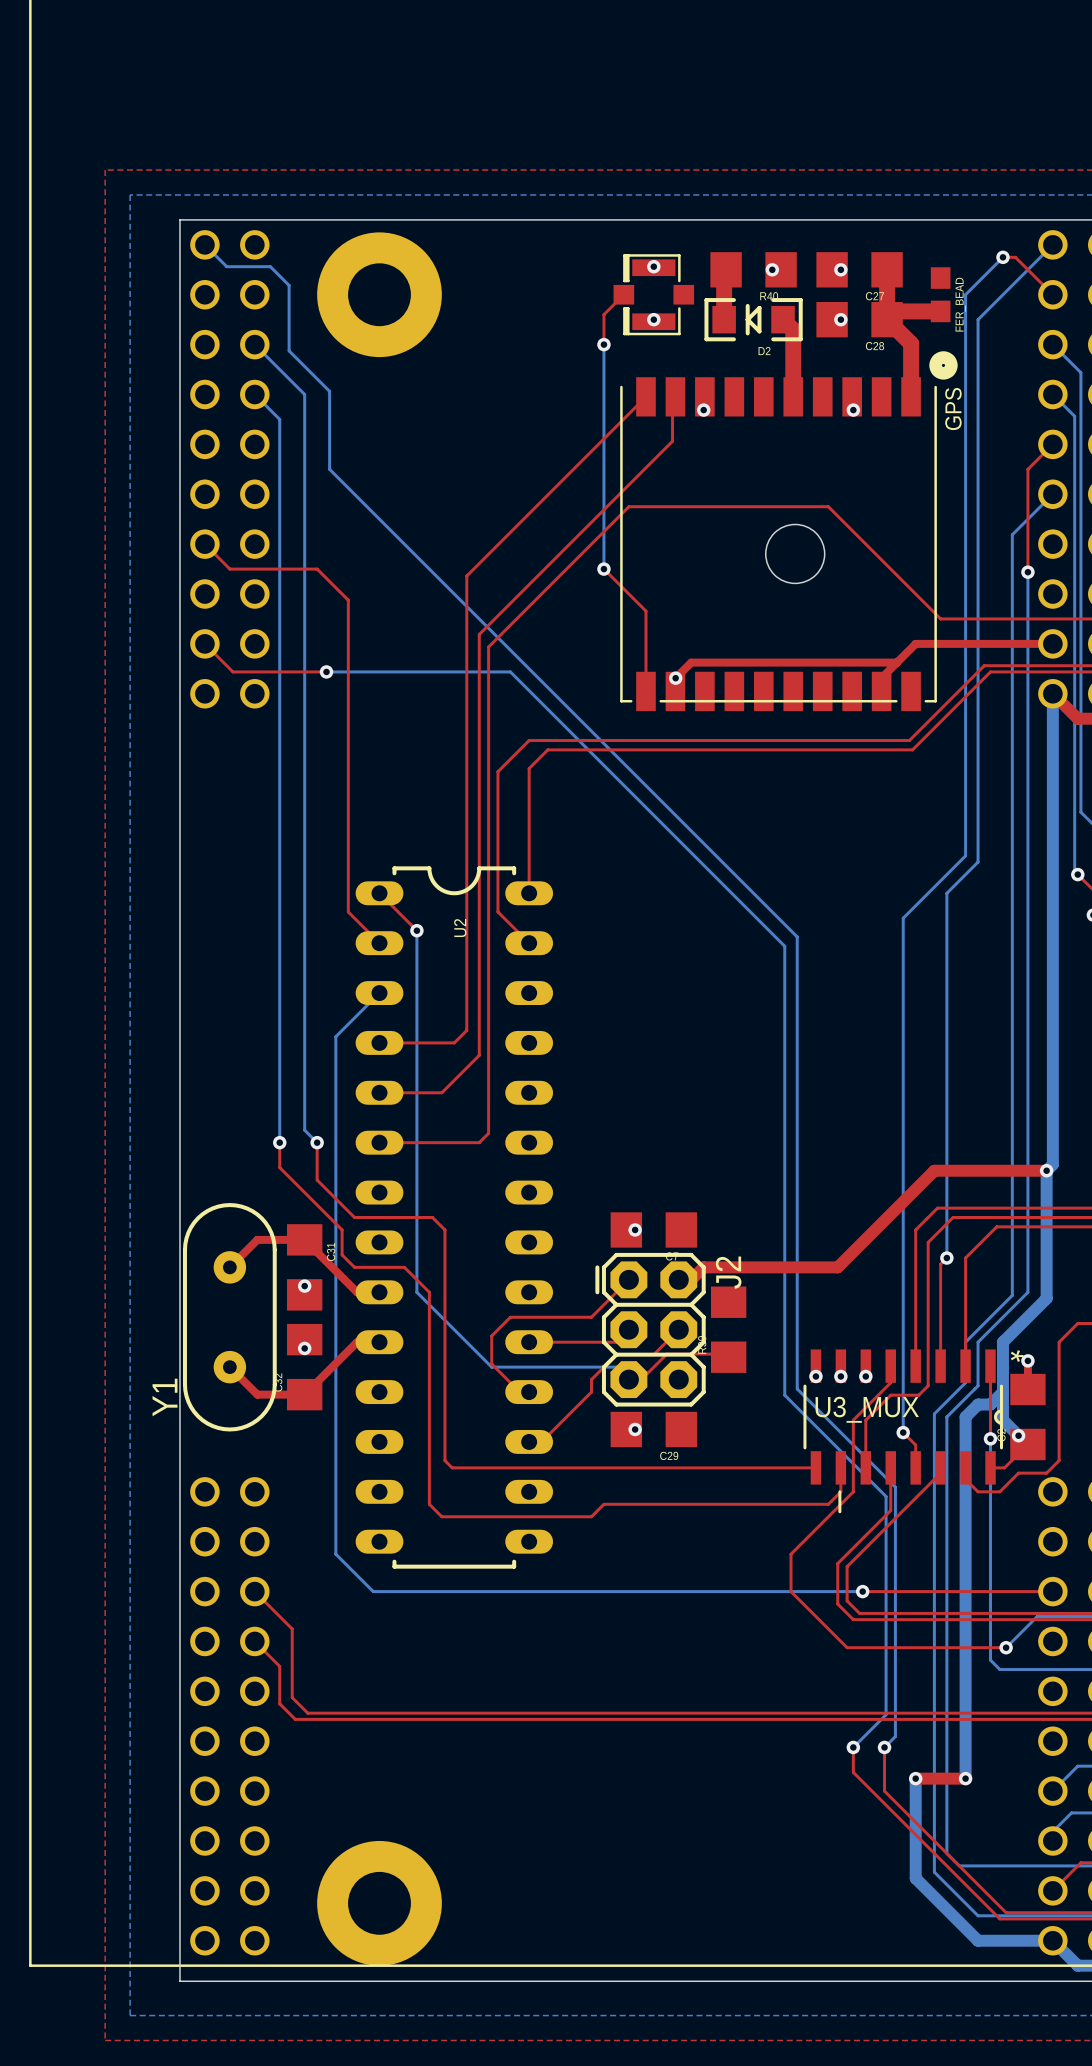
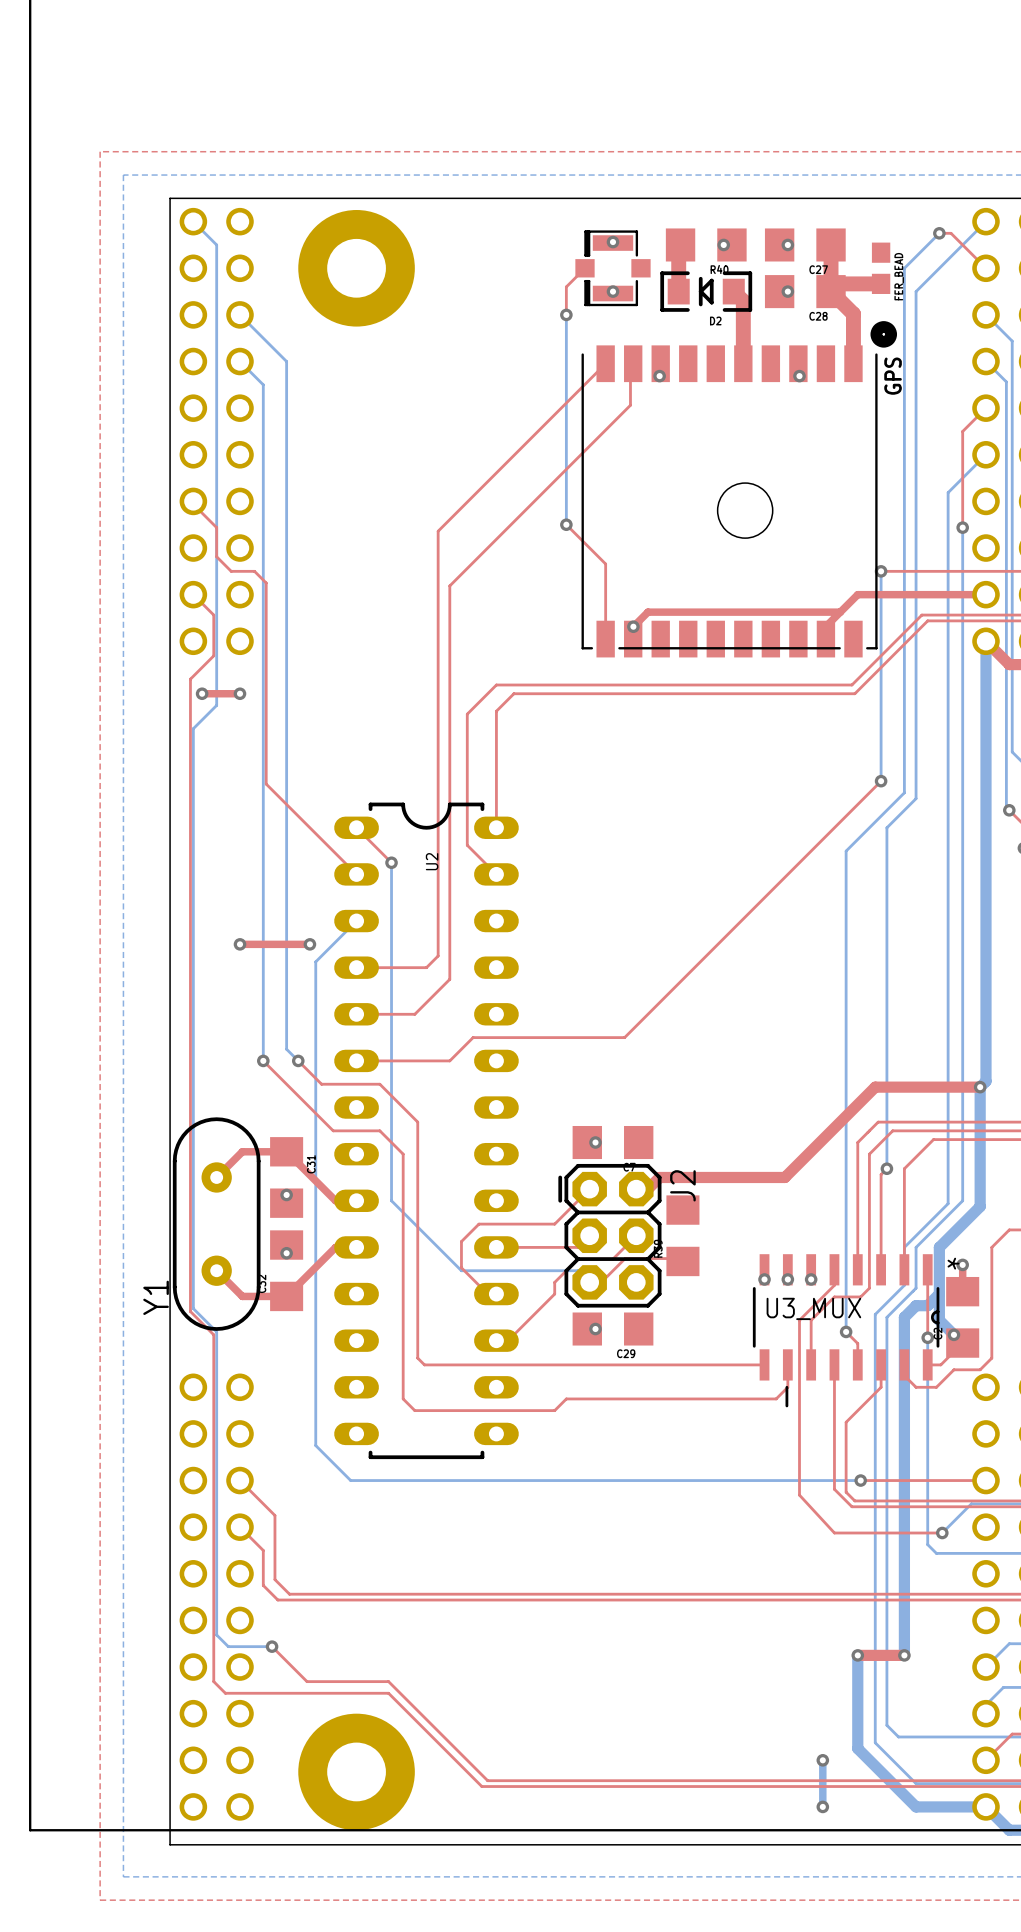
bottom track: (226, 266) (270, 266) (289, 285) (289, 350) (329, 391) (329, 469) (797, 936) (797, 1388) (895, 1487) (895, 1736) (884, 1747) -> (213, 242) (216, 244) (216, 705) (193, 728) (193, 1308) (216, 1331) (216, 1634) (228, 1646) (272, 1646)
top track: (204, 544) (229, 569) (317, 569) (348, 600) (348, 911) -> (193, 501) (193, 504) (216, 527) (216, 556) (231, 571) (254, 571) (266, 583) (266, 784) (327, 845)
top track: (940, 618) (828, 506) (628, 506) (488, 647) (488, 1133) -> (881, 781) (624, 1037) (473, 1037) (458, 1052)
bottom track: none -> (881, 571) (881, 781)
via: none -> (881, 571)
top track: (226, 665) (232, 671) (326, 671) -> none
bottom track: (326, 671) (510, 671) (784, 946) (784, 1395) (886, 1496) (886, 1714) (853, 1747) -> none
via: (326, 671) -> none
top track: none -> (202, 693) (239, 693)
via: none -> (202, 693)
via: none -> (239, 693)
via: none -> (881, 781)
top track: none -> (239, 944) (309, 944)
via: none -> (239, 944)
via: none -> (309, 944)
top track: (279, 1142) (279, 1167) (342, 1229) (342, 1254) (354, 1267) (404, 1267) (429, 1292) -> none
top track: (317, 1142) (317, 1180) -> (263, 1060) (298, 1095)
top track: none -> (298, 1060) (321, 1084) (379, 1084) (417, 1122) (417, 1142)
top track: (404, 1217) (432, 1217) (444, 1229) -> (379, 1130) (403, 1154) (403, 1200)
top track: (940, 1473) (847, 1566) (847, 1600) (859, 1613) (912, 1613) -> (881, 1369) (881, 1387) (846, 1422) (846, 1492) (854, 1500)
top track: (853, 1491) (791, 1554) (791, 1591) (847, 1647) (890, 1647) -> (799, 1387) (799, 1495) (834, 1533)
top track: (890, 1510) (837, 1563) (837, 1604) (853, 1619) (909, 1619) -> (834, 1404) (834, 1489) (851, 1506)
top track: (862, 1591) (918, 1591) -> none
bottom track: none -> (808, 1480) (860, 1480)
via position: (862, 1591) -> (860, 1480)
top track: (853, 1747) (853, 1772) (999, 1918) -> (213, 615) (213, 655) (190, 679) (190, 1311) (213, 1334) (213, 1681) (225, 1693) (388, 1693) (481, 1786) (936, 1786)
via: (853, 1747) -> none
top track: (884, 1747) (884, 1791) (1006, 1912) -> (272, 1646) (307, 1681) (388, 1681) (487, 1780) (942, 1780)
via: (884, 1747) -> none
via: none -> (272, 1646)
bottom track: none -> (822, 1760) (822, 1806)
via: none -> (822, 1760)
via: none -> (822, 1806)

